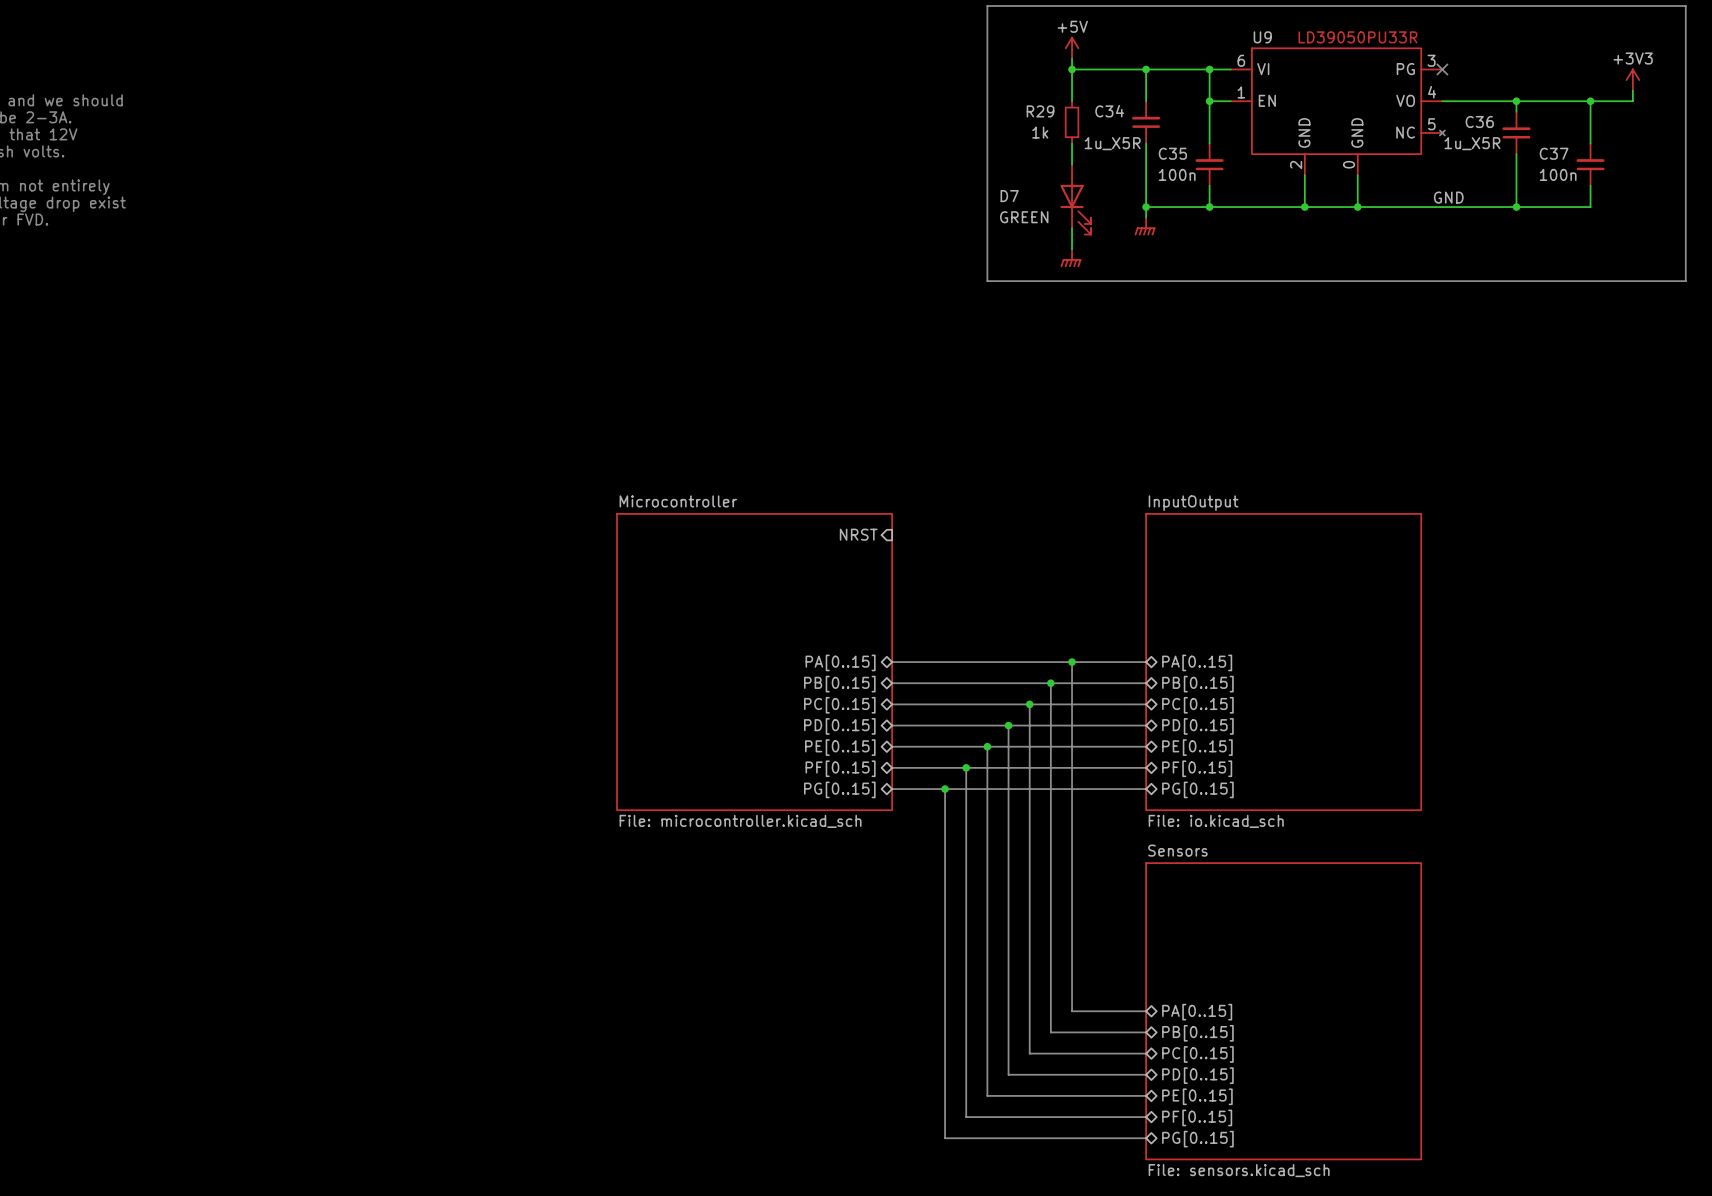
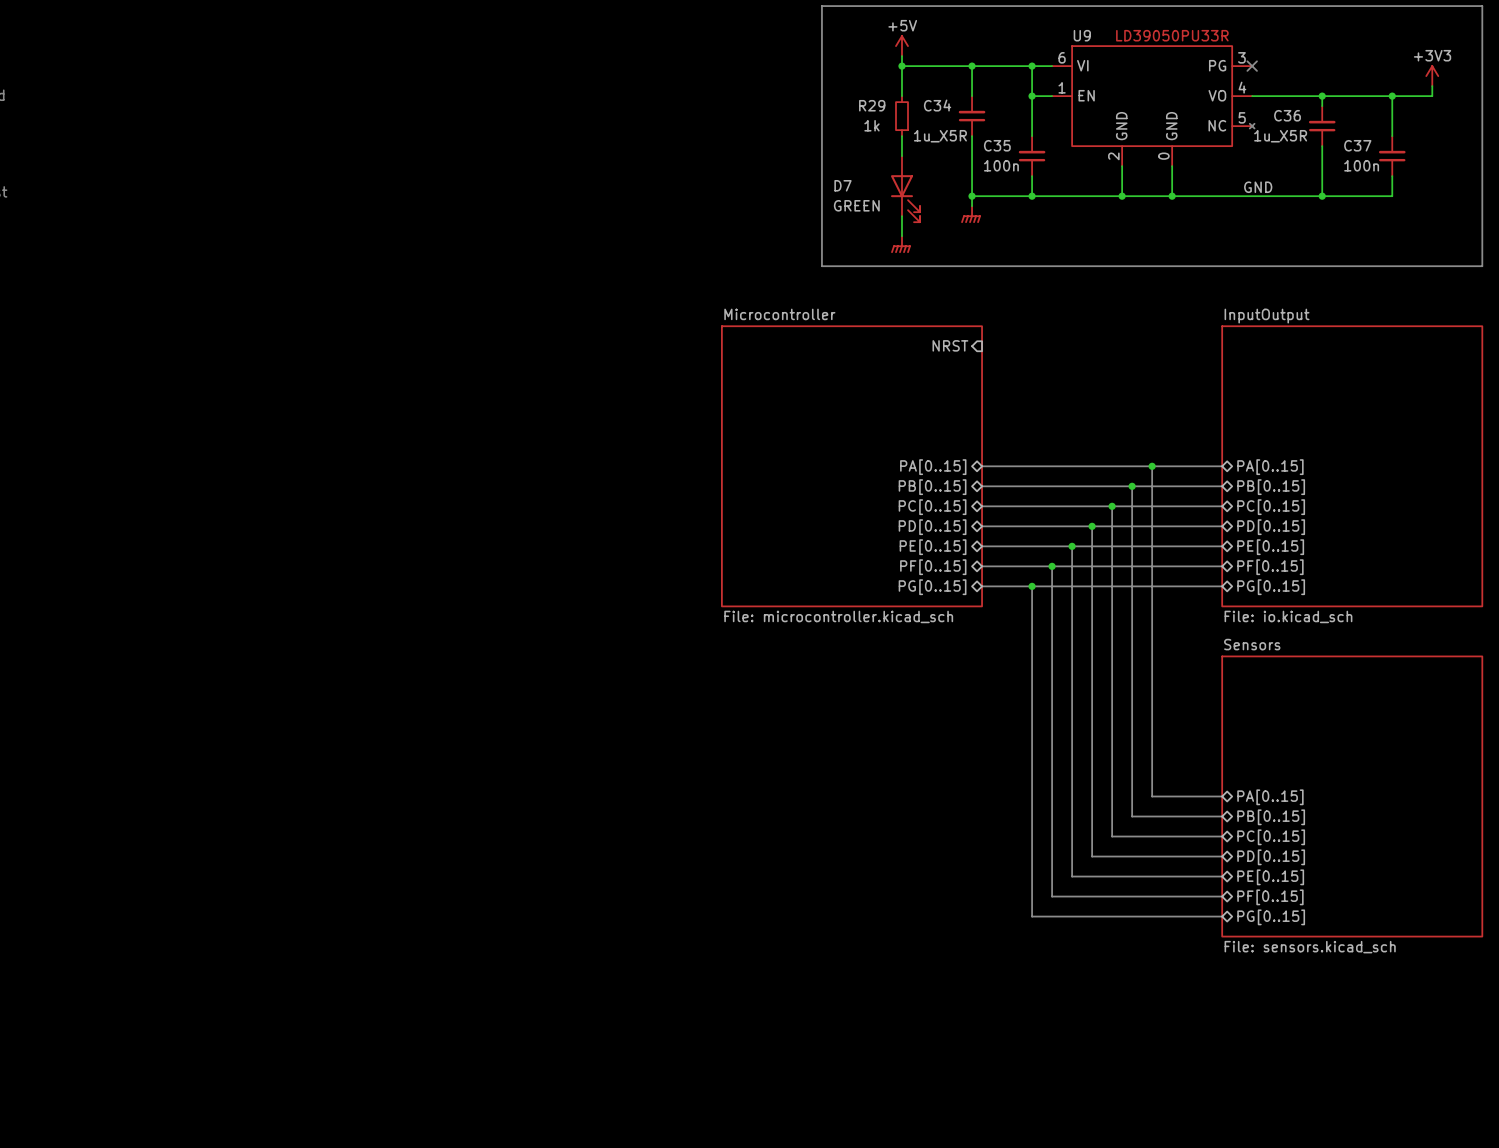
sheet pin: none -> NRST (950, 345)
sheet Microcontroller: none -> File: microcontroller.kicad_sch (851, 466)
bus: none -> (982, 466) (1222, 466)
bus: none -> (1152, 466) (1152, 796) (1222, 796)
junction: none -> (1152, 466)
sheet InputOutput: none -> File: io.kicad_sch (1352, 466)
sheet pin: none -> PA[0..15] (933, 467)
sheet pin: none -> PA[0..15] (1270, 467)
bus: none -> (982, 486) (1222, 486)
bus: none -> (1132, 486) (1132, 816) (1222, 816)
junction: none -> (1132, 486)
sheet pin: none -> PB[0..15] (932, 487)
sheet pin: none -> PB[0..15] (1271, 487)
sheet pin: NRST (858, 534) -> none
sheet pin: none -> PC[0..15] (932, 507)
bus: none -> (982, 506) (1222, 506)
bus: none -> (1112, 506) (1112, 836) (1222, 836)
junction: none -> (1112, 506)
sheet pin: none -> PC[0..15] (1271, 507)
bus: none -> (982, 526) (1222, 526)
bus: none -> (1092, 526) (1092, 856) (1222, 856)
junction: none -> (1092, 526)
sheet pin: none -> PD[0..15] (932, 527)
sheet pin: none -> PD[0..15] (1271, 527)
bus: none -> (982, 546) (1222, 546)
bus: none -> (1072, 546) (1072, 876) (1222, 876)
junction: none -> (1072, 546)
sheet pin: none -> PE[0..15] (933, 547)
sheet pin: none -> PE[0..15] (1270, 547)
bus: none -> (982, 566) (1222, 566)
bus: none -> (1052, 566) (1052, 896) (1222, 896)
junction: none -> (1052, 566)
sheet pin: none -> PF[0..15] (933, 567)
sheet pin: none -> PF[0..15] (1270, 567)
bus: none -> (982, 586) (1222, 586)
bus: none -> (1032, 586) (1032, 916) (1222, 916)
junction: none -> (1032, 586)
sheet pin: none -> PG[0..15] (932, 587)
sheet pin: none -> PG[0..15] (1271, 587)
sheet Microcontroller: File: microcontroller.kicad_sch (754, 662) -> none
sheet pin: PA[0..15] (840, 662) -> none
bus: (892, 662) (1146, 662) -> none
bus: (1072, 662) (1072, 1011) (1146, 1011) -> none
junction: (1072, 662) -> none
sheet pin: PA[0..15] (1197, 662) -> none
sheet InputOutput: File: io.kicad_sch (1283, 662) -> none
bus: (892, 683) (1146, 683) -> none
bus: (1050, 683) (1050, 1032) (1146, 1032) -> none
junction: (1050, 683) -> none
sheet pin: PB[0..15] (839, 684) -> none
sheet pin: PB[0..15] (1197, 684) -> none
bus: (892, 704) (1146, 704) -> none
bus: (1029, 704) (1029, 1053) (1146, 1053) -> none
junction: (1029, 704) -> none
sheet pin: PC[0..15] (839, 705) -> none
sheet pin: PC[0..15] (1197, 705) -> none
bus: (892, 725) (1146, 725) -> none
bus: (1008, 725) (1008, 1074) (1146, 1074) -> none
junction: (1008, 725) -> none
sheet pin: PD[0..15] (839, 726) -> none
sheet pin: PD[0..15] (1197, 726) -> none
bus: (892, 746) (1146, 746) -> none
bus: (987, 746) (987, 1095) (1146, 1095) -> none
junction: (987, 746) -> none
sheet pin: PE[0..15] (840, 747) -> none
sheet pin: PE[0..15] (1197, 747) -> none
bus: (892, 767) (1146, 767) -> none
bus: (966, 767) (966, 1117) (1146, 1117) -> none
junction: (966, 767) -> none
sheet pin: PF[0..15] (840, 768) -> none
sheet pin: PF[0..15] (1197, 768) -> none
sheet pin: PG[0..15] (839, 789) -> none
bus: (892, 789) (1146, 789) -> none
bus: (945, 789) (945, 1138) (1146, 1138) -> none
junction: (945, 789) -> none
sheet pin: PG[0..15] (1197, 789) -> none
sheet Sensors: none -> File: sensors.kicad_sch (1352, 796)
sheet pin: none -> PA[0..15] (1270, 797)
sheet pin: none -> PB[0..15] (1271, 817)
sheet pin: none -> PC[0..15] (1271, 837)
sheet pin: none -> PD[0..15] (1271, 857)
sheet pin: none -> PE[0..15] (1270, 877)
sheet pin: none -> PF[0..15] (1270, 897)
sheet pin: none -> PG[0..15] (1271, 917)
sheet Sensors: File: sensors.kicad_sch (1283, 1011) -> none
sheet pin: PA[0..15] (1197, 1012) -> none
sheet pin: PB[0..15] (1197, 1033) -> none
sheet pin: PC[0..15] (1197, 1054) -> none
sheet pin: PD[0..15] (1197, 1075) -> none
sheet pin: PE[0..15] (1197, 1096) -> none
sheet pin: PF[0..15] (1197, 1117) -> none
sheet pin: PG[0..15] (1197, 1139) -> none

